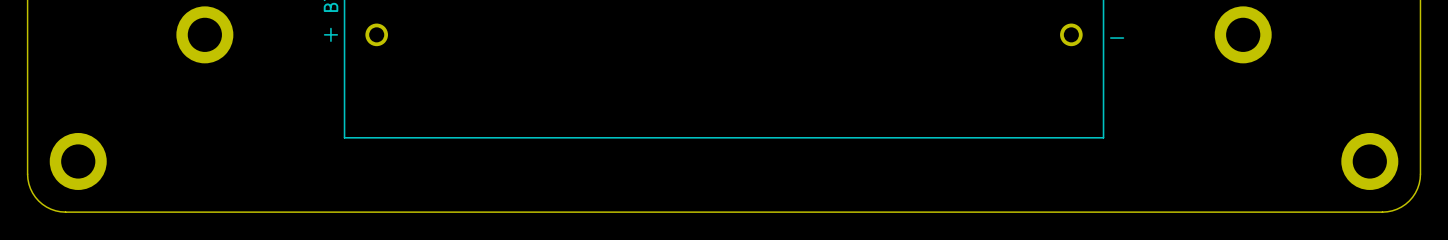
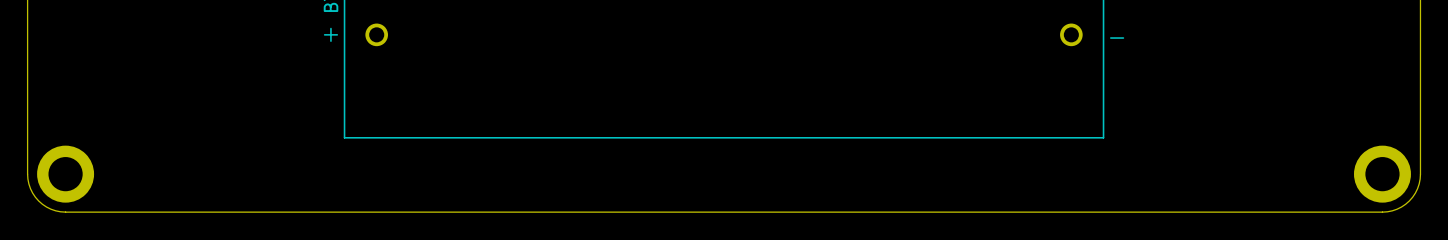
part: (204, 34) -> none
part: (1243, 34) -> none
part position: (78, 161) -> (65, 174)
part position: (1369, 161) -> (1382, 174)

